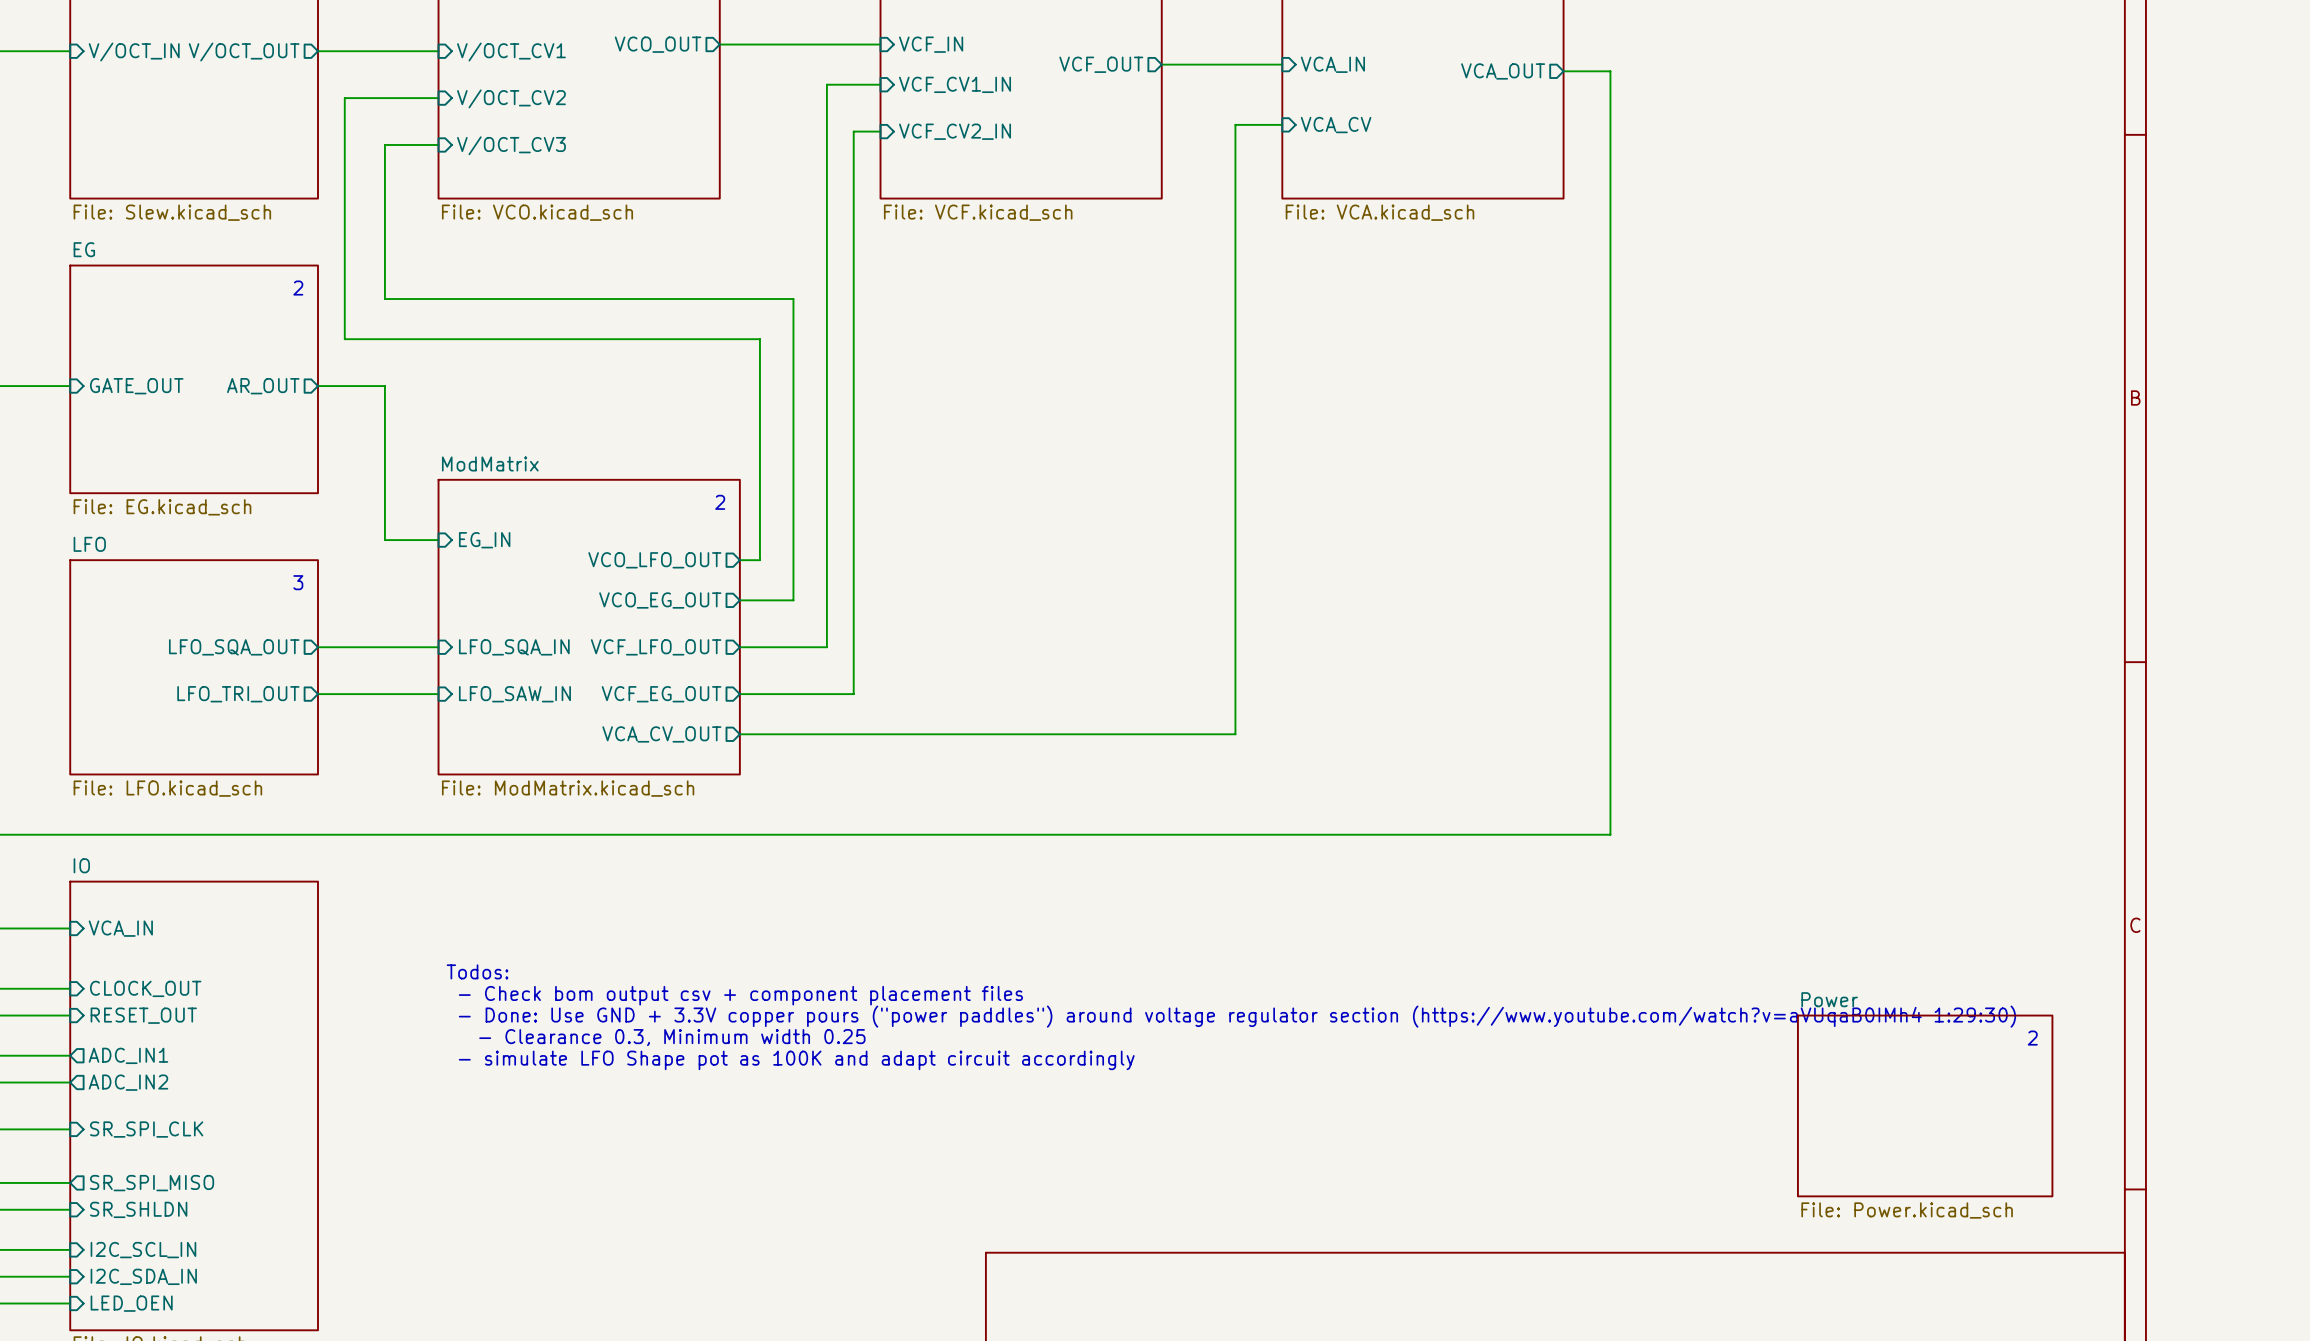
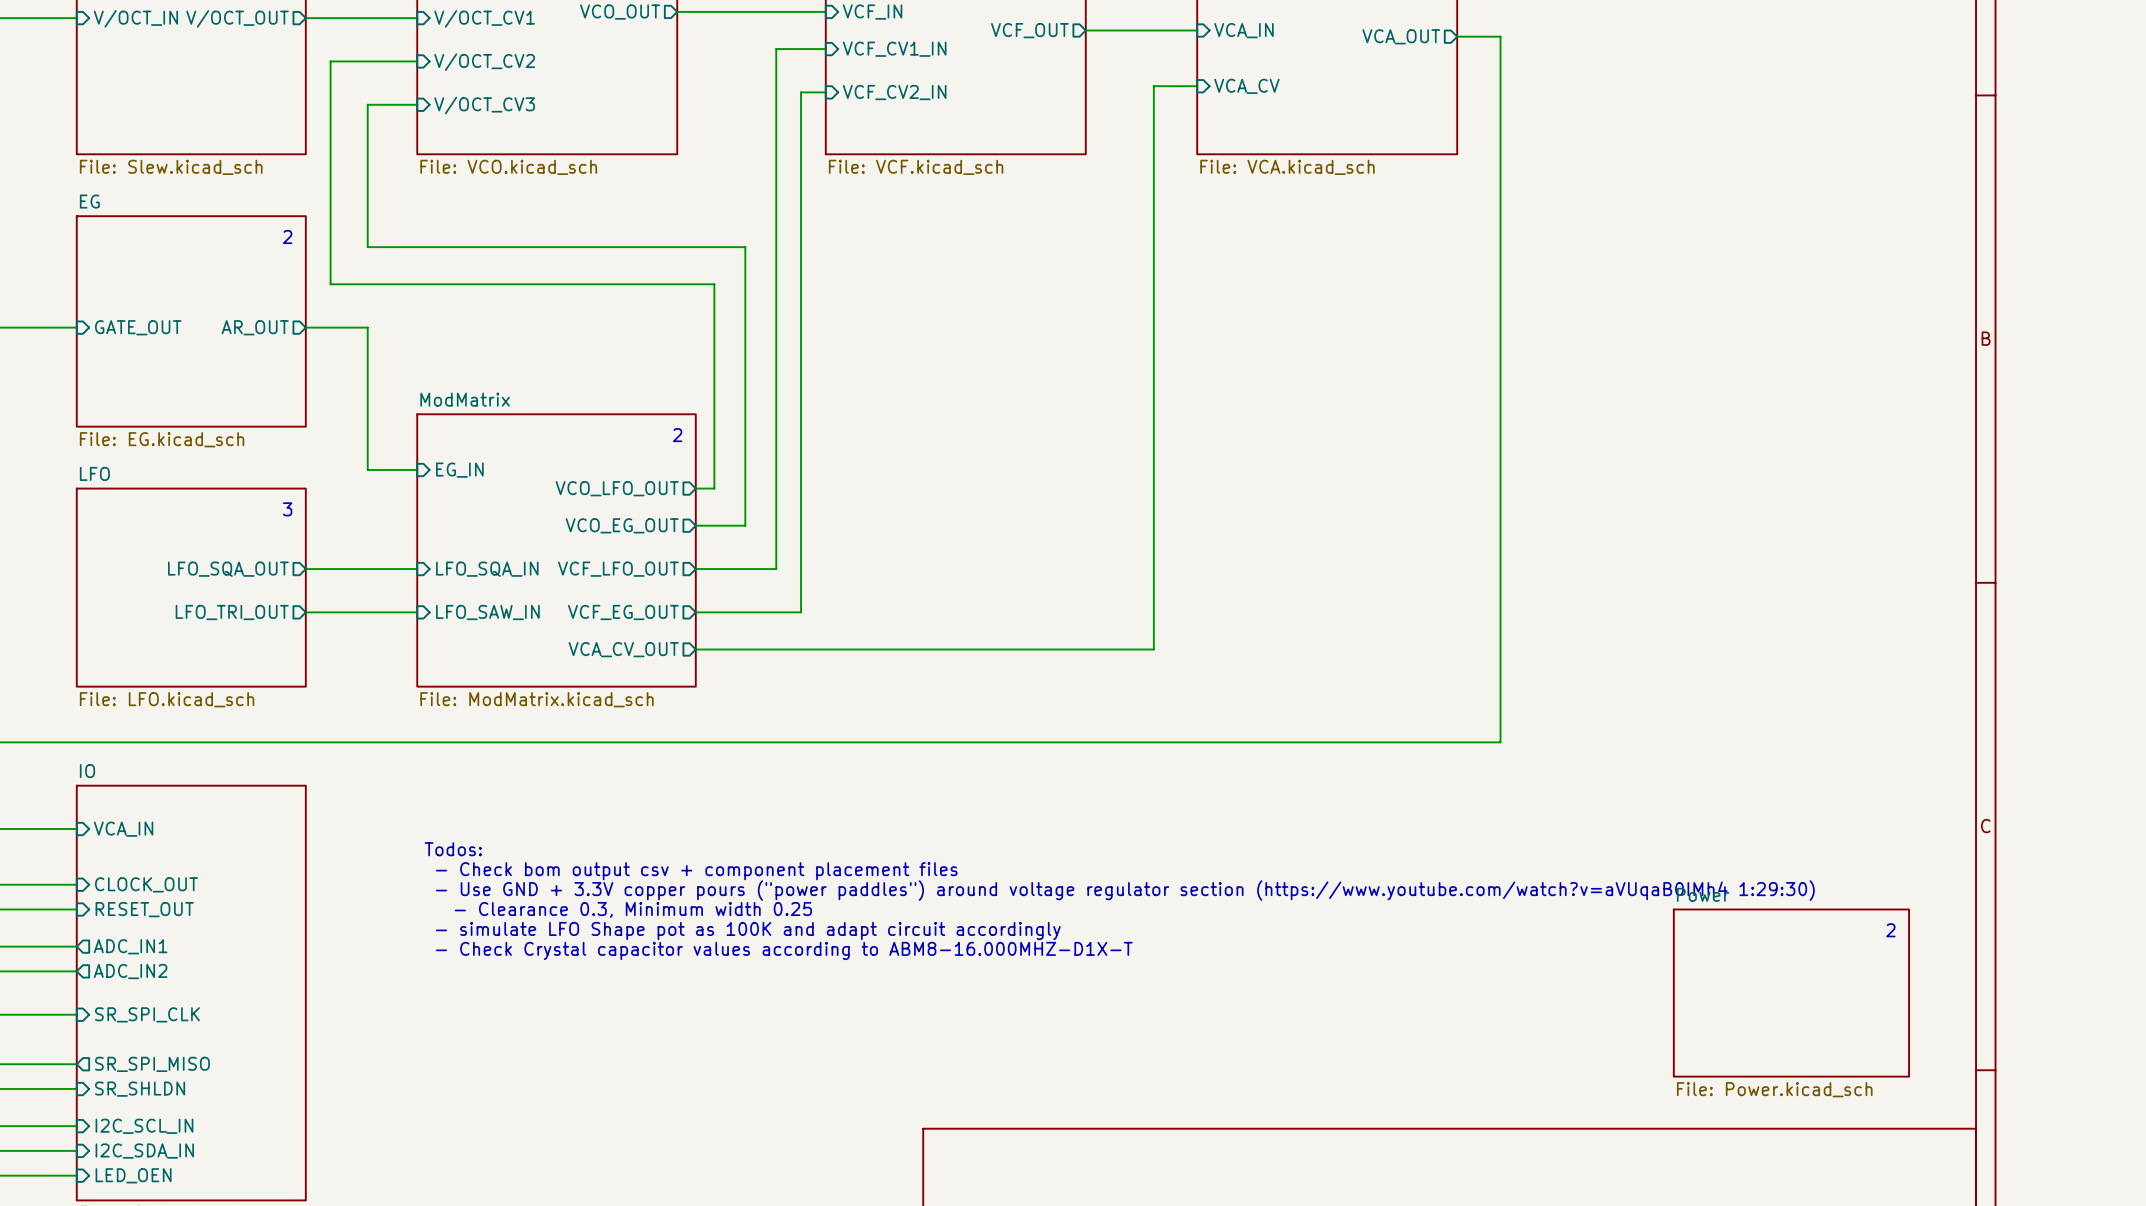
text: none -> Todos: (453, 849)
text: Todos: (477, 971) -> - Check bom output csv + component placement files (696, 871)
text: - Check bom output csv + component placement files (740, 995) -> - Use GND + 3.3V copper pours ("power paddles") around voltage regulator section (https://www.youtube.com/watch?v=aVUqaB0IMh4 1:29:30) (1125, 890)
text: - Done: Use GND + 3.3V copper pours ("power paddles") around voltage regulator section (https://www.youtube.com/watch?v=aVUqaB0IMh4 1:29:30) (1237, 1016) -> - Clearance 0.3, Minimum width 0.25 (633, 909)
text: - Clearance 0.3, Minimum width 0.25 (672, 1037) -> - simulate LFO Shape pot as 100K and adapt circuit accordingly (748, 931)
text: - simulate LFO Shape pot as 100K and adapt circuit accordingly (796, 1060) -> - Check Crystal capacitor values according to ABM8-16.000MHZ-D1X-T (784, 950)

